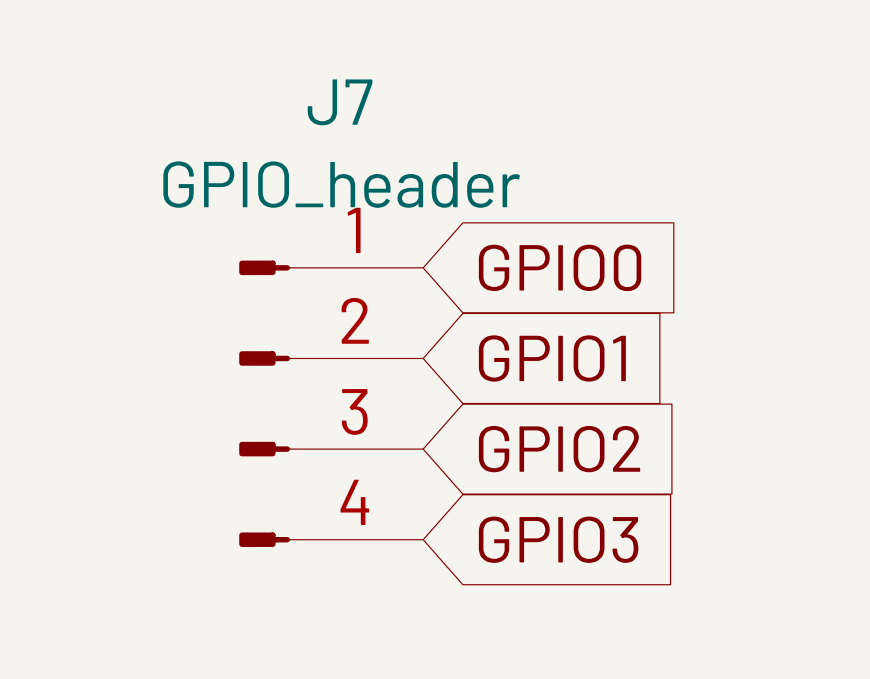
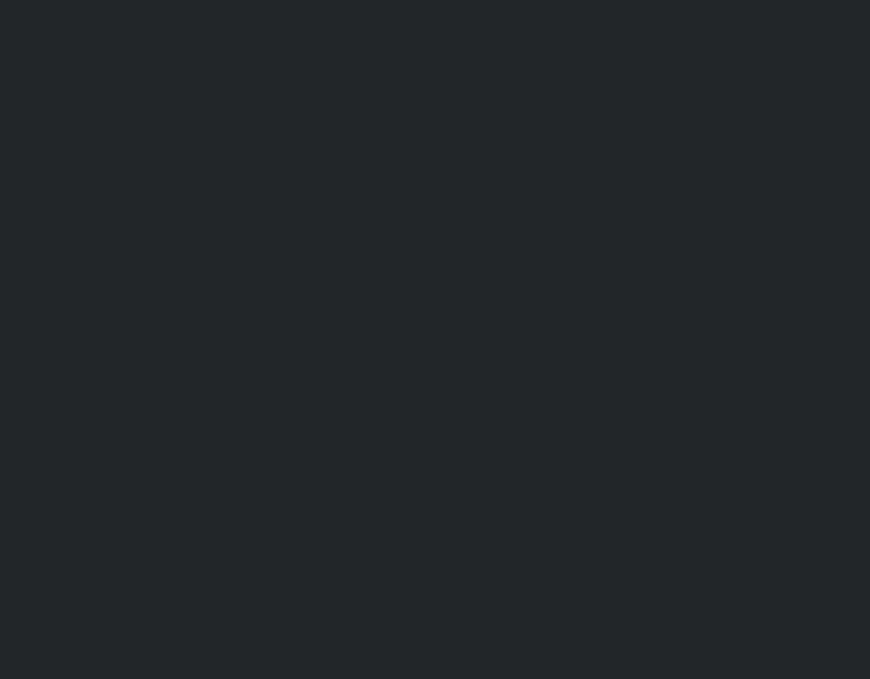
global label: GPIO0 (560, 267) -> none
global label: GPIO1 (552, 358) -> none
J7: GPIO_header (331, 403) -> none
global label: GPIO2 (559, 449) -> none
global label: GPIO3 (558, 539) -> none

